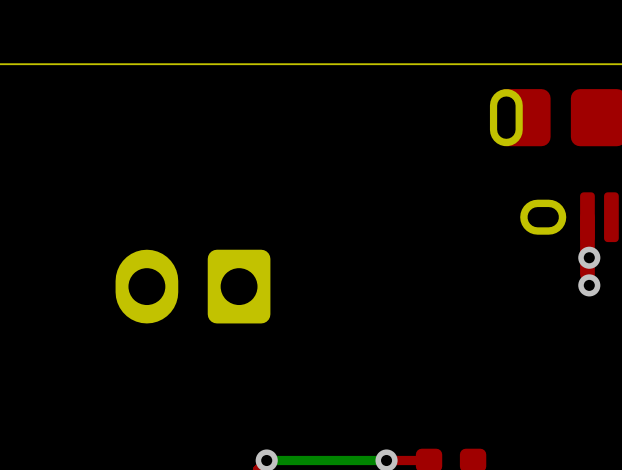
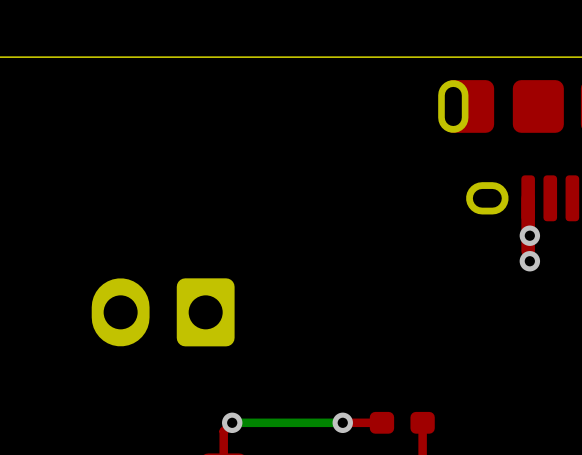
part position: (192, 286) -> (163, 312)

